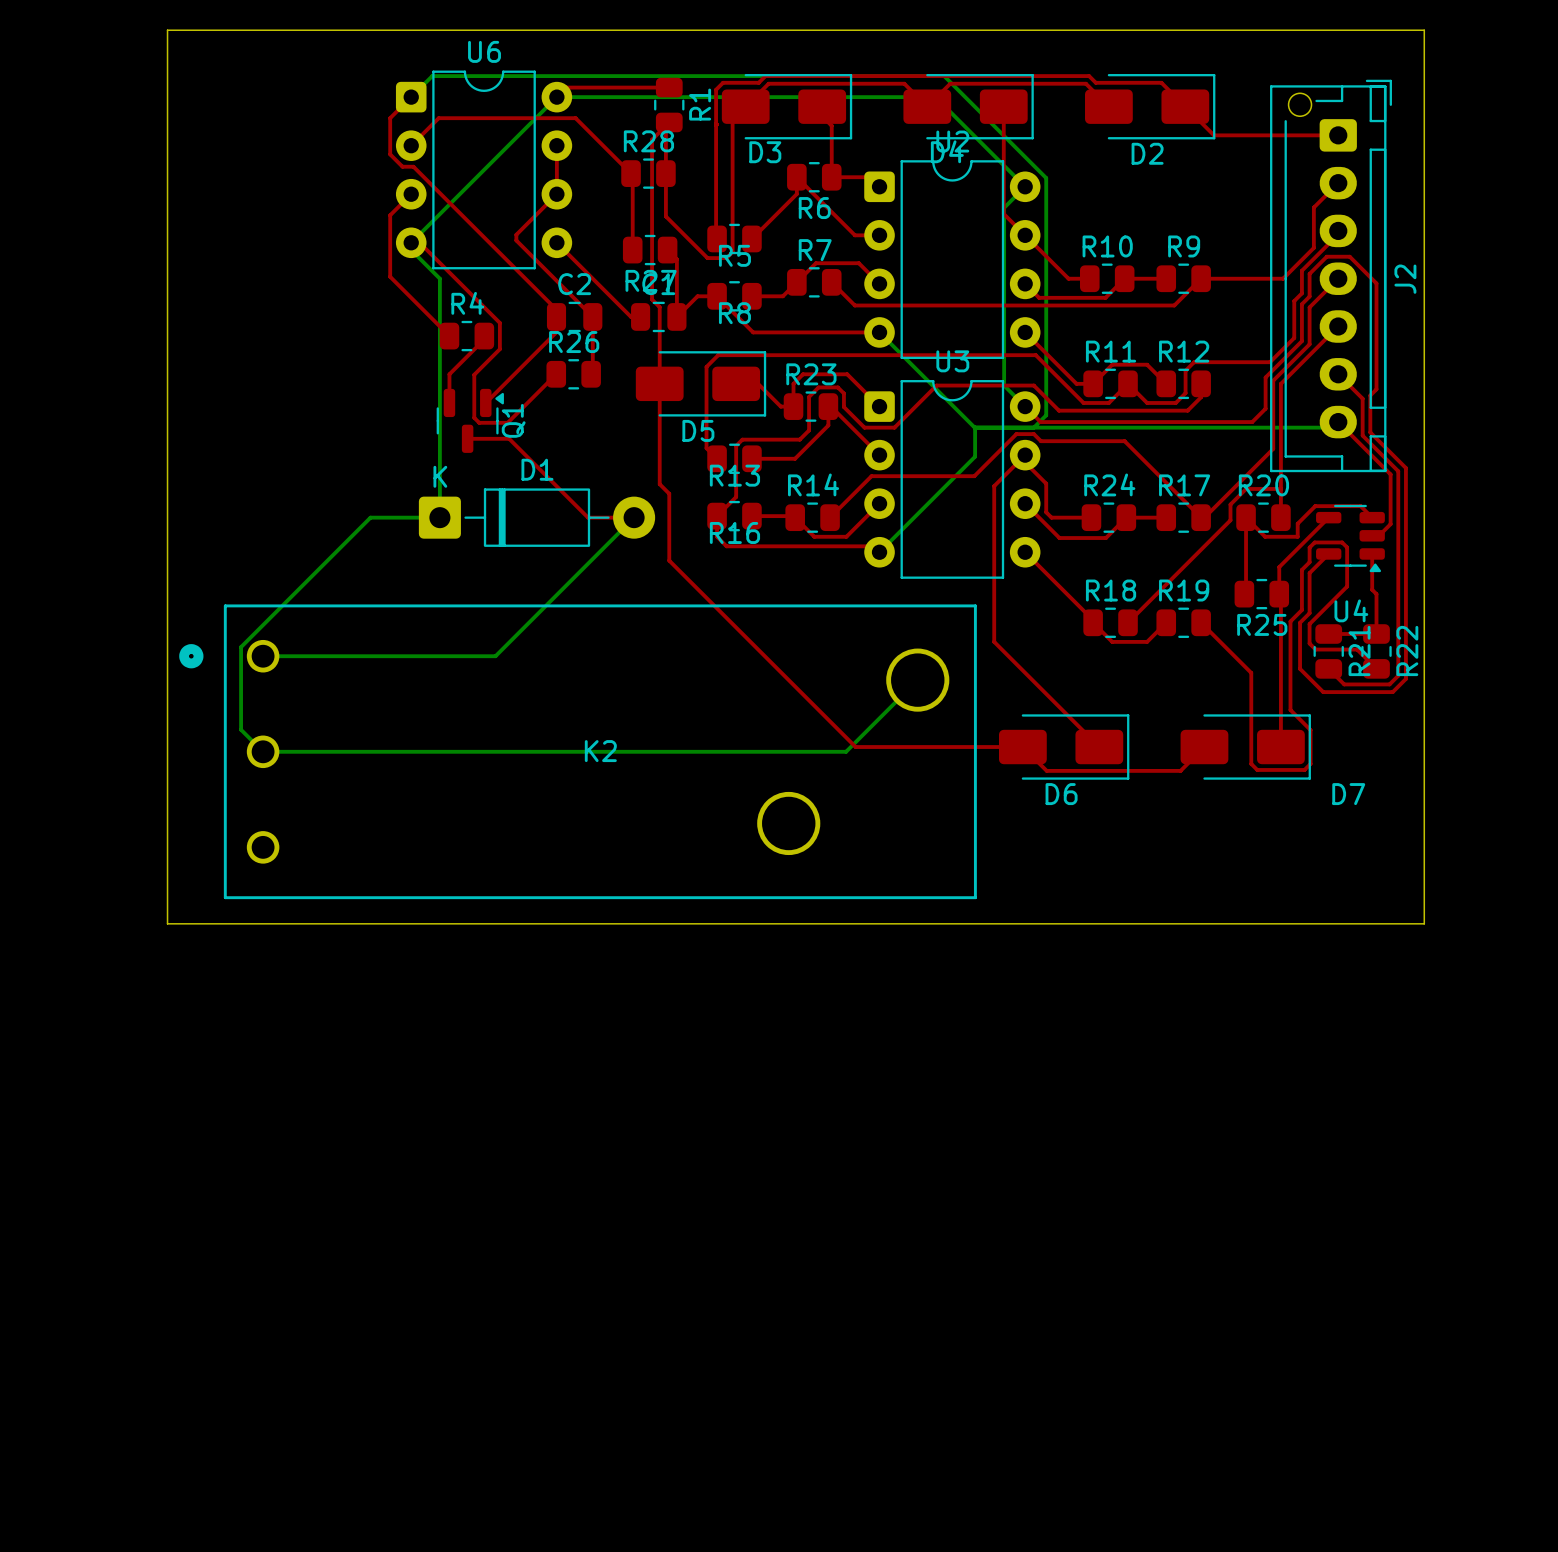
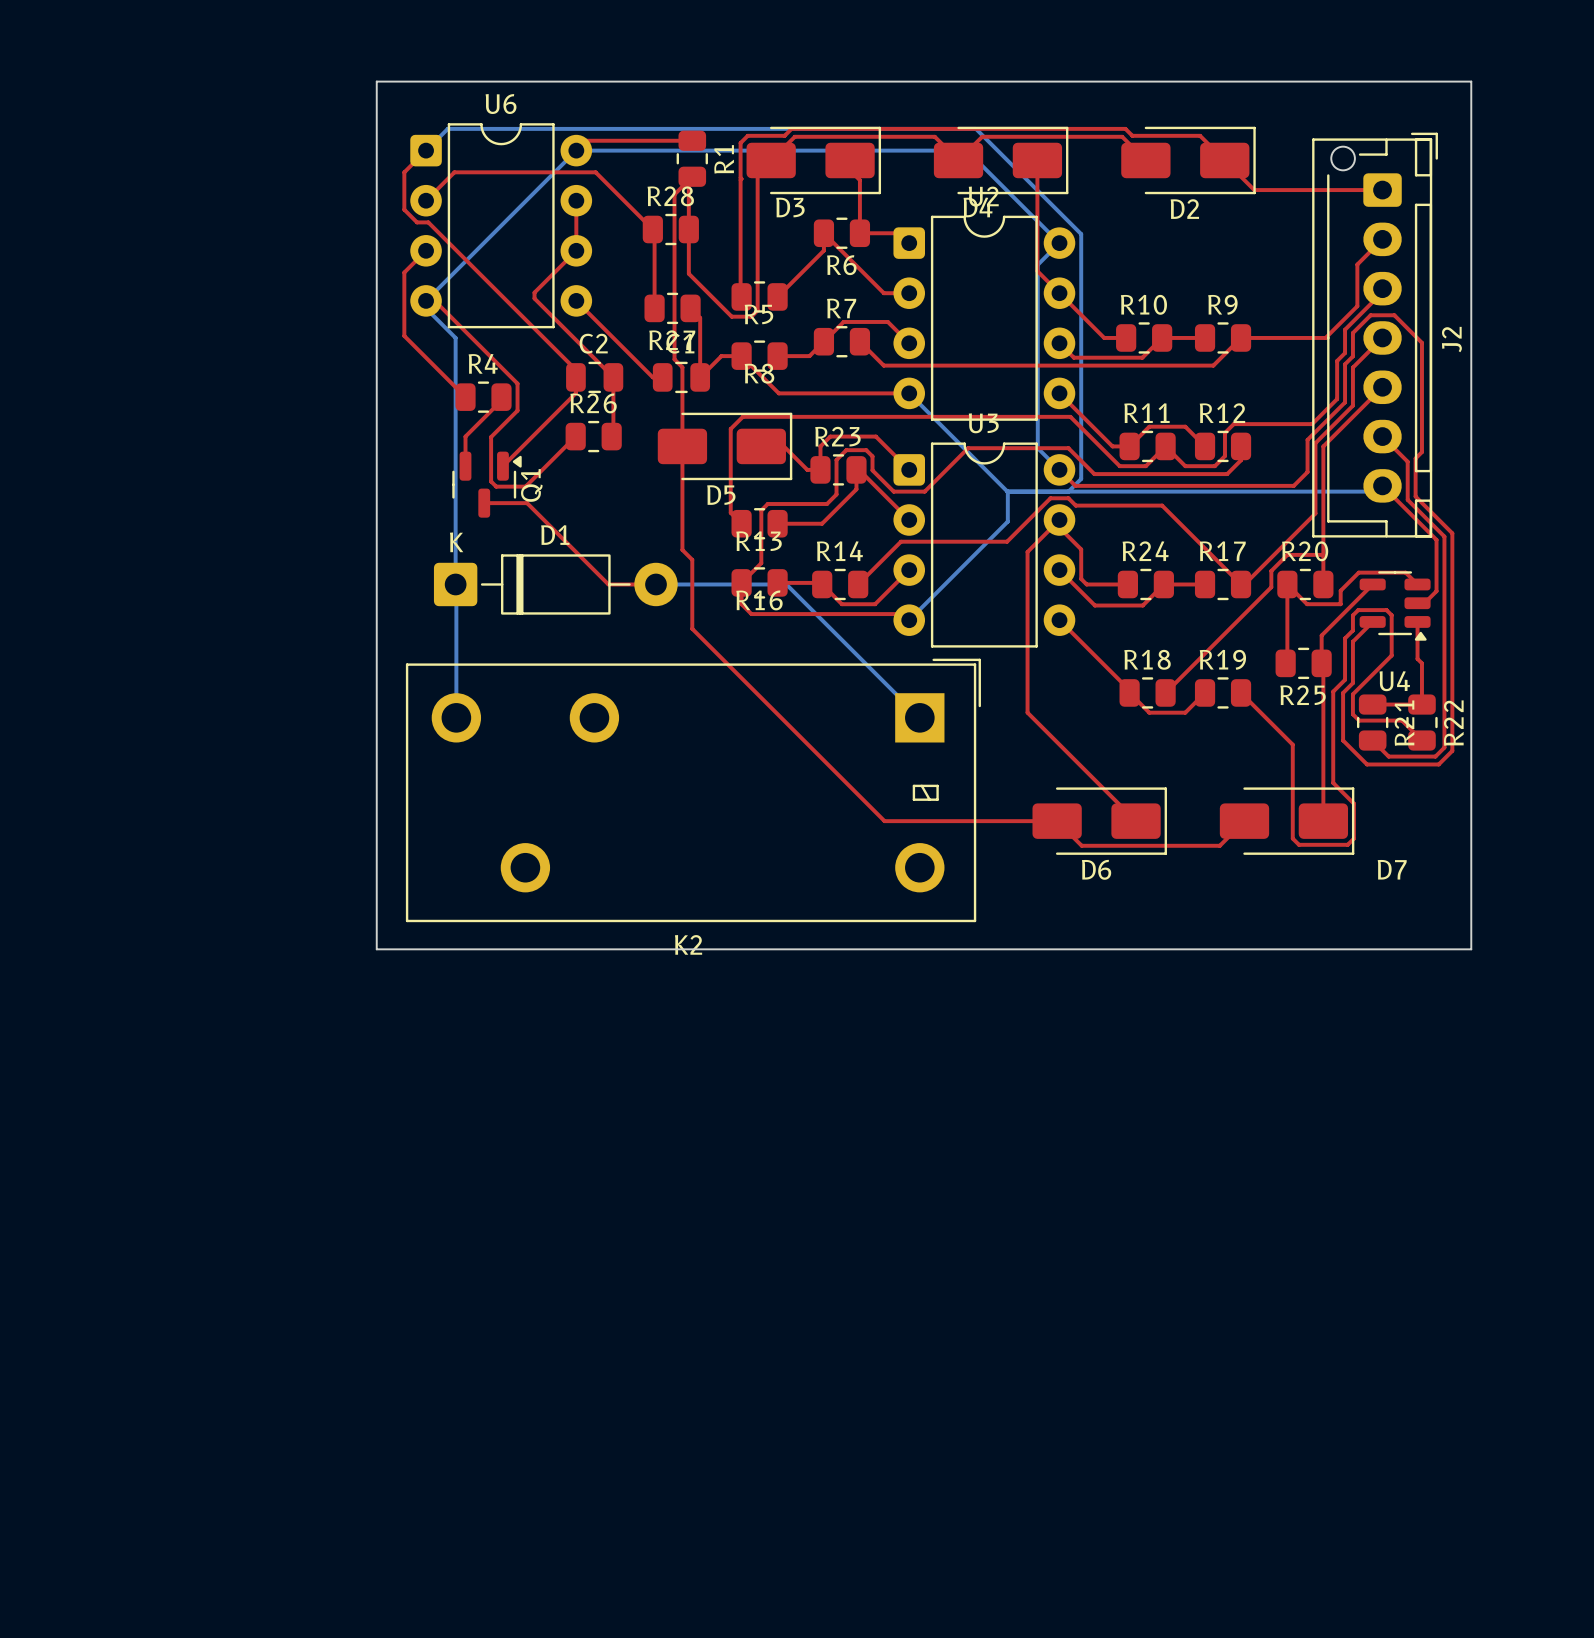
board edge: (363, 30) (167, 30) (167, 923) (1424, 923) (1424, 871) -> (376, 81) (376, 949) (1471, 949)
bottom track: (439, 517) (370, 517) (241, 647) (241, 729) (263, 751) (846, 751) (917, 680) -> (455, 584) (456, 717)
bottom track: (634, 517) (495, 656) (263, 656) -> (656, 584) (786, 584) (919, 717)
K2 footprint: [179, 604, 977, 900] -> [405, 658, 981, 923]
K2 name position: K2 (600, 751) -> K2 (688, 944)

